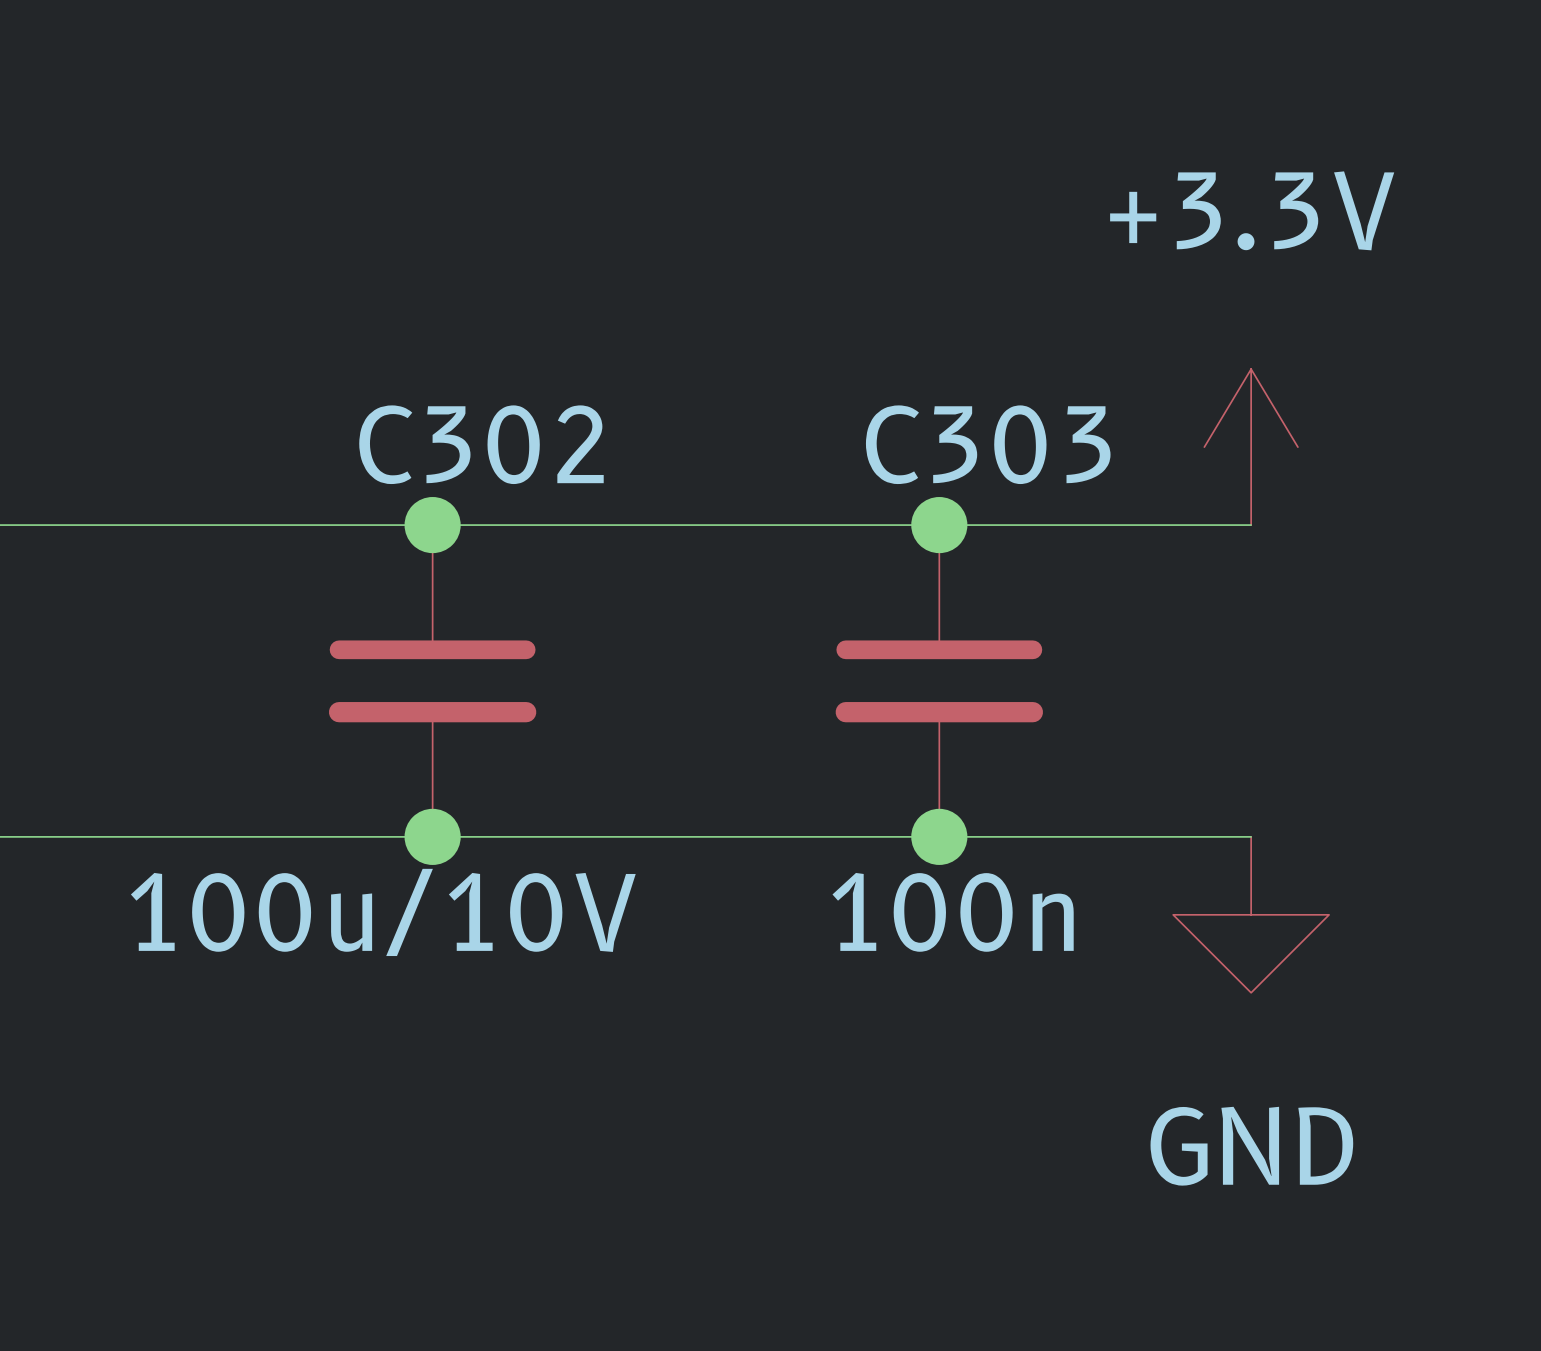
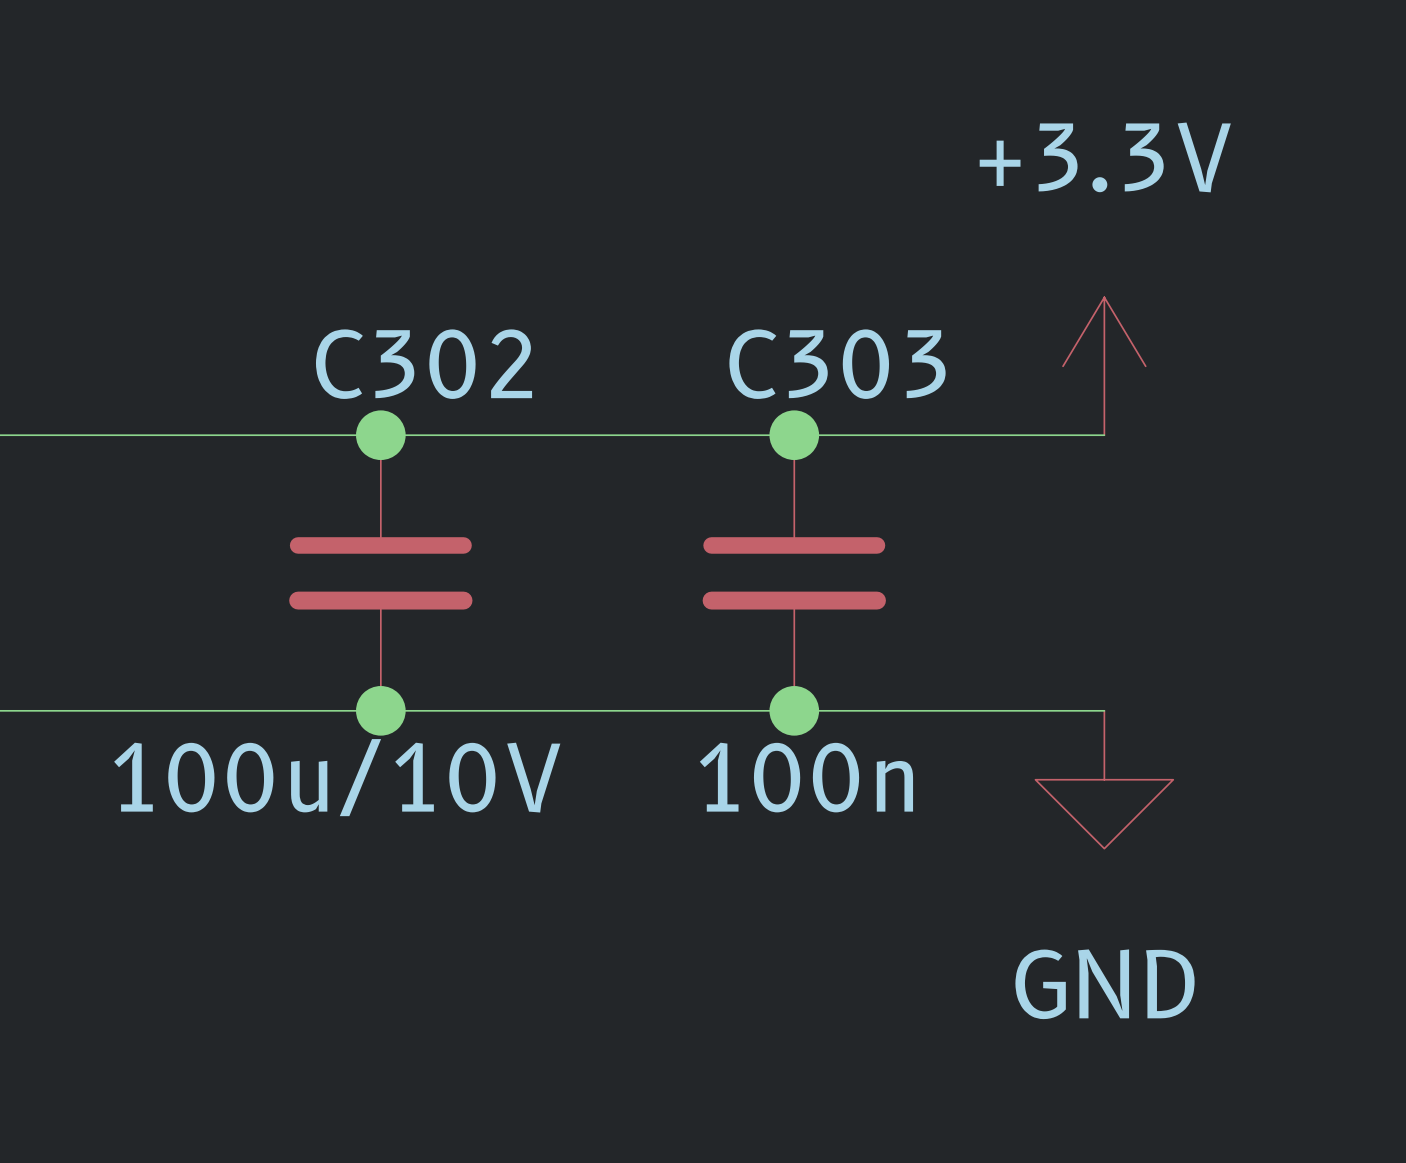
junction position: (939, 525) -> (794, 435)
C303 position: (939, 680) -> (794, 573)
junction position: (939, 836) -> (794, 710)

